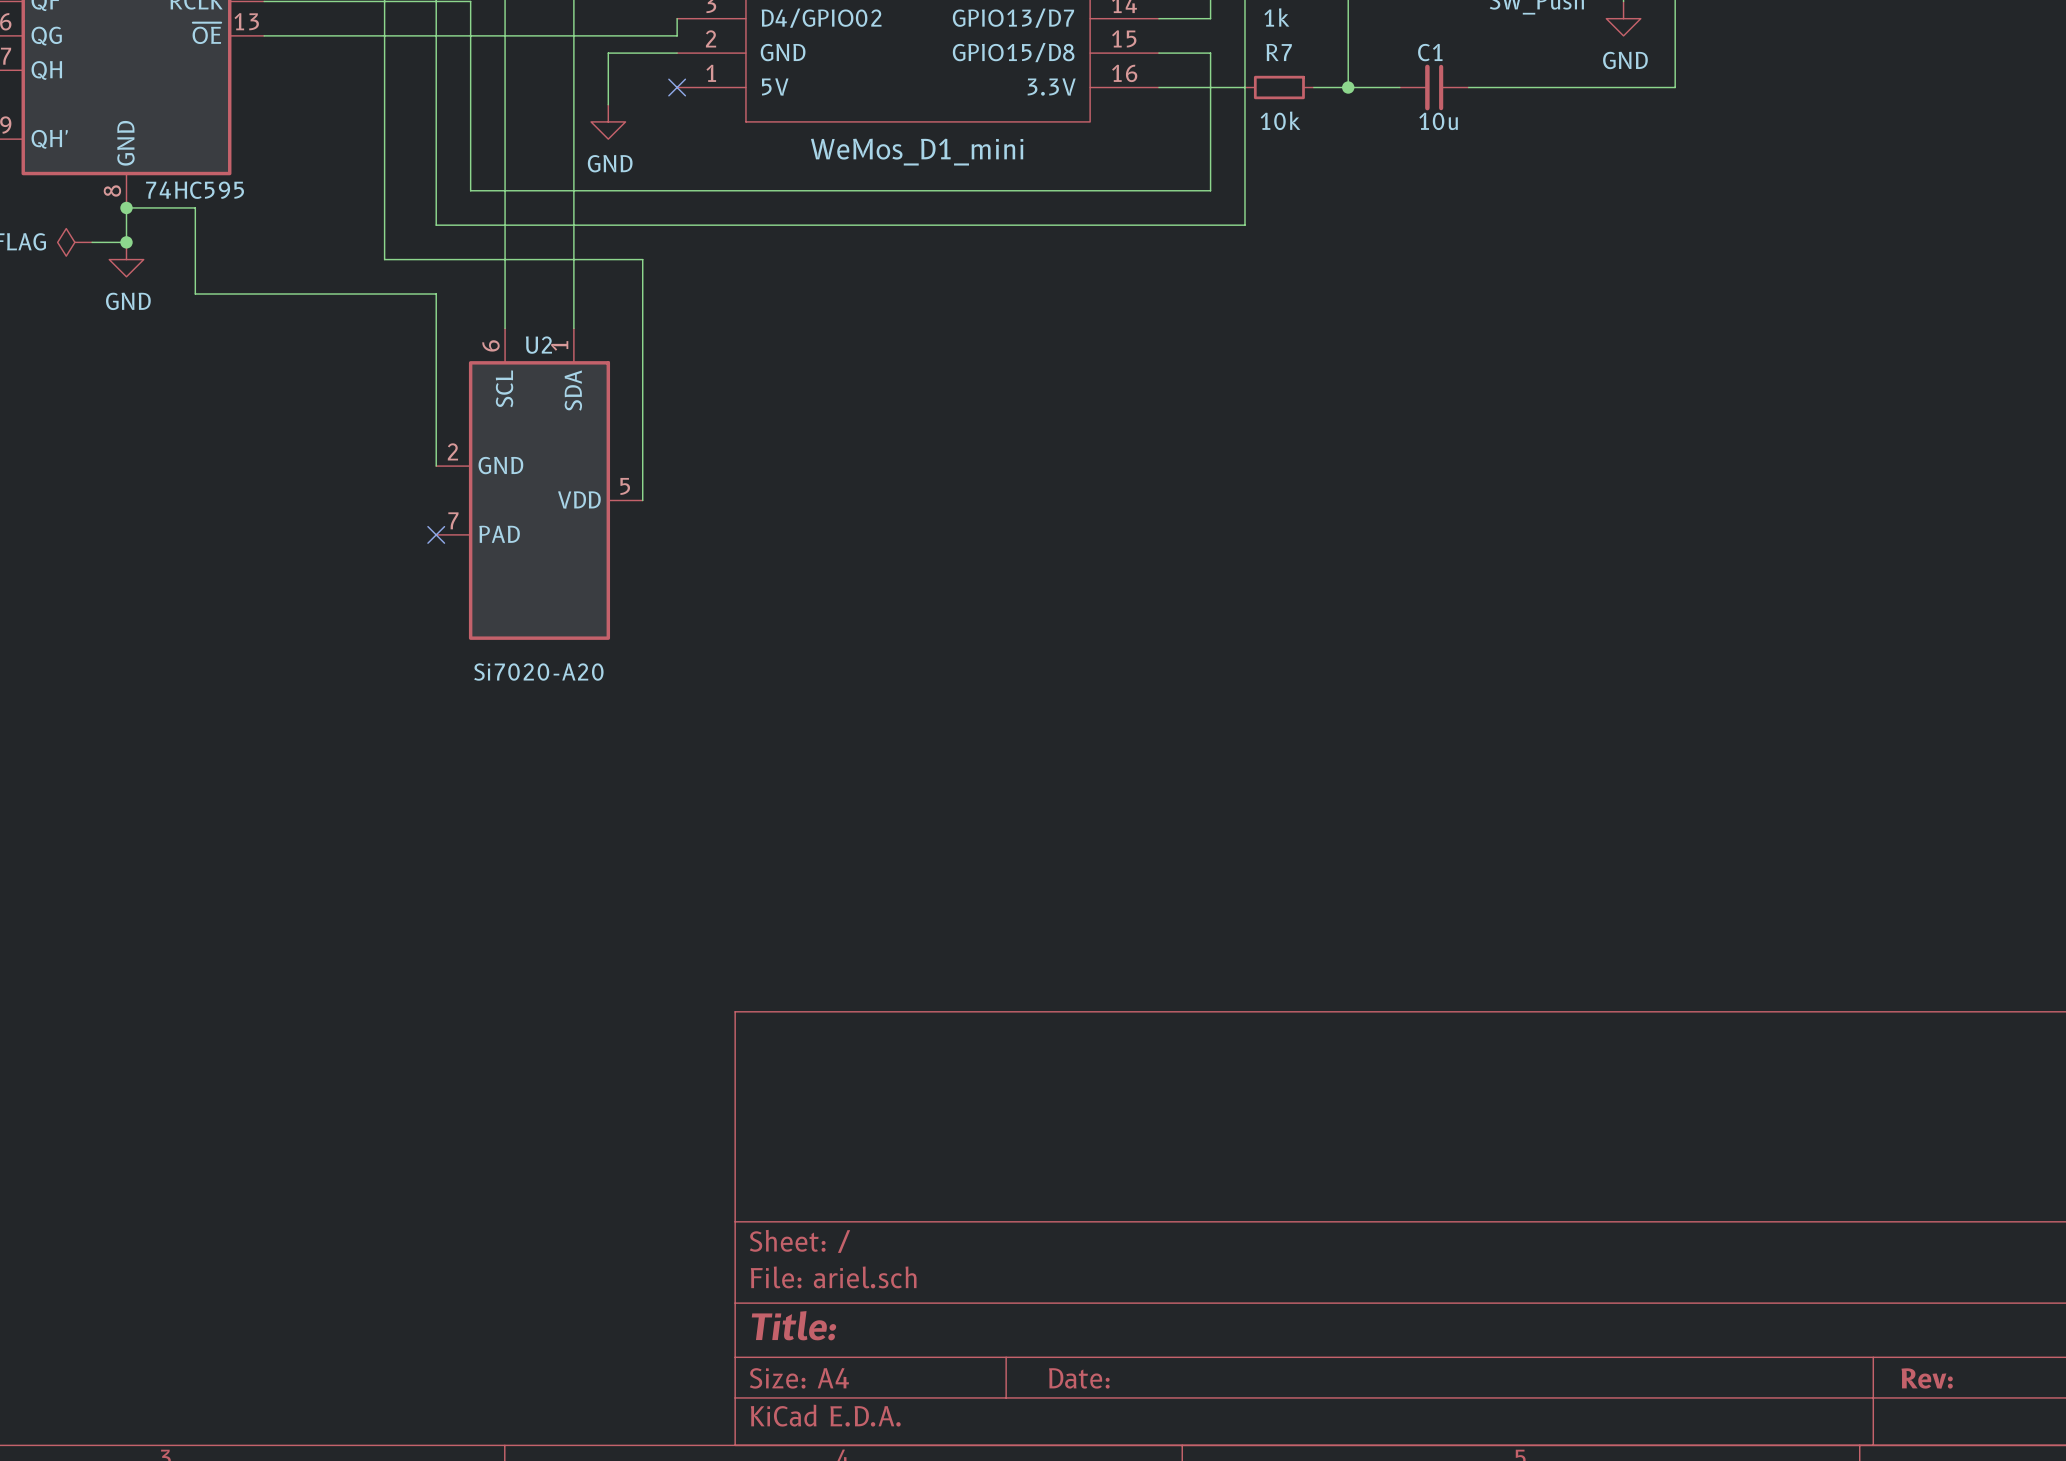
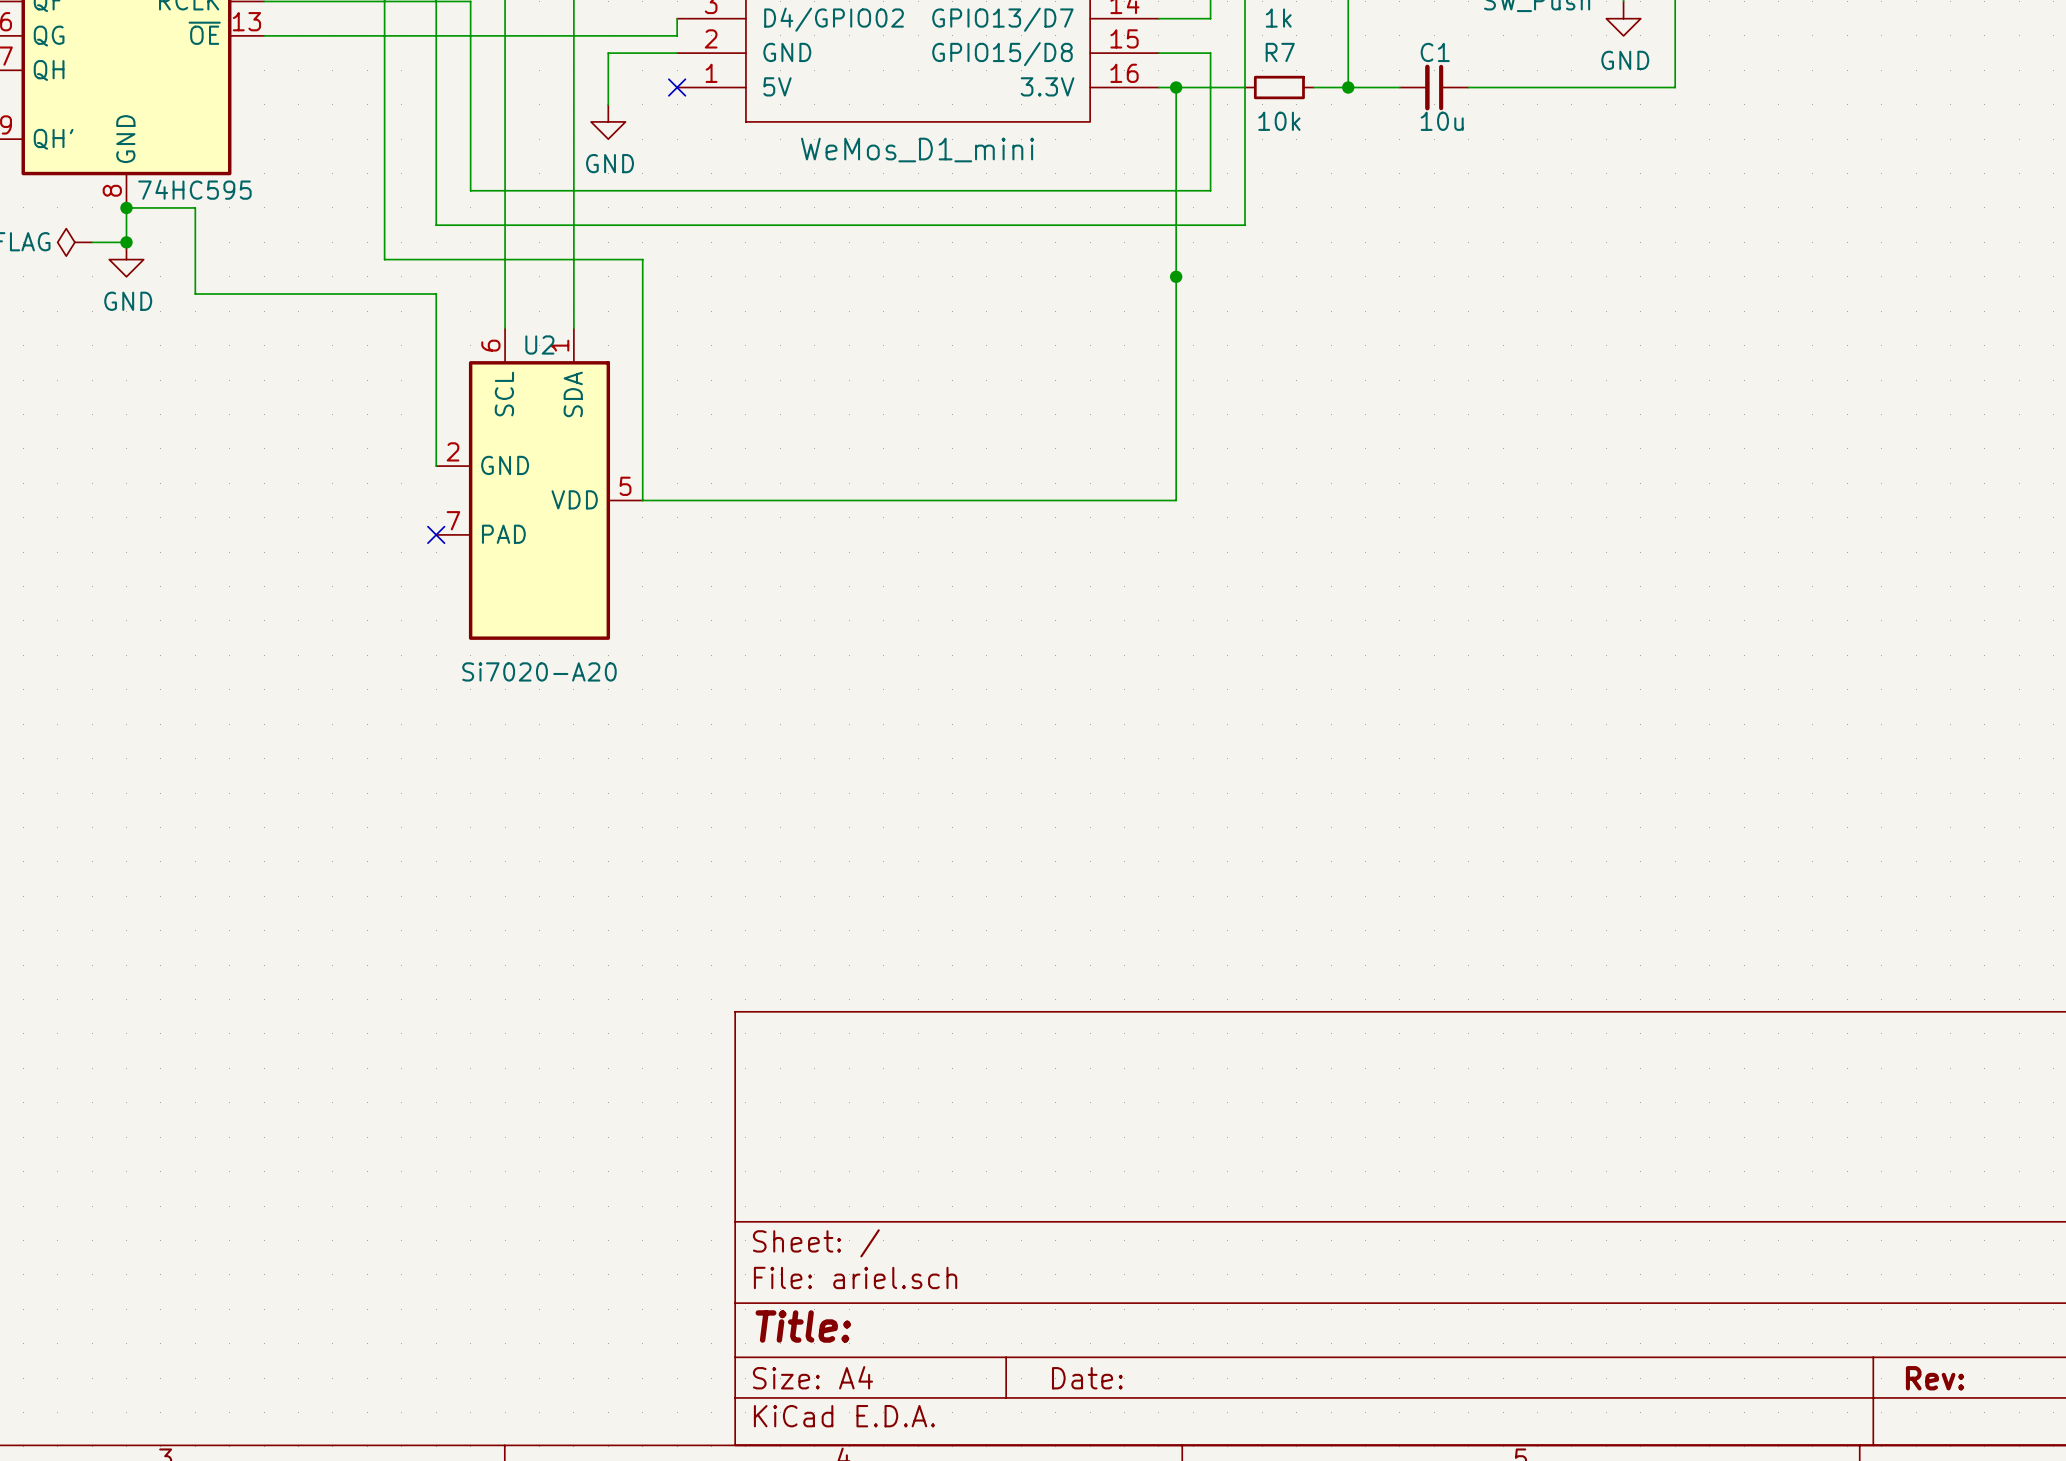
wire: none -> (1176, 87) (1176, 500) (642, 500)
junction: none -> (1176, 87)
junction: none -> (1176, 276)

